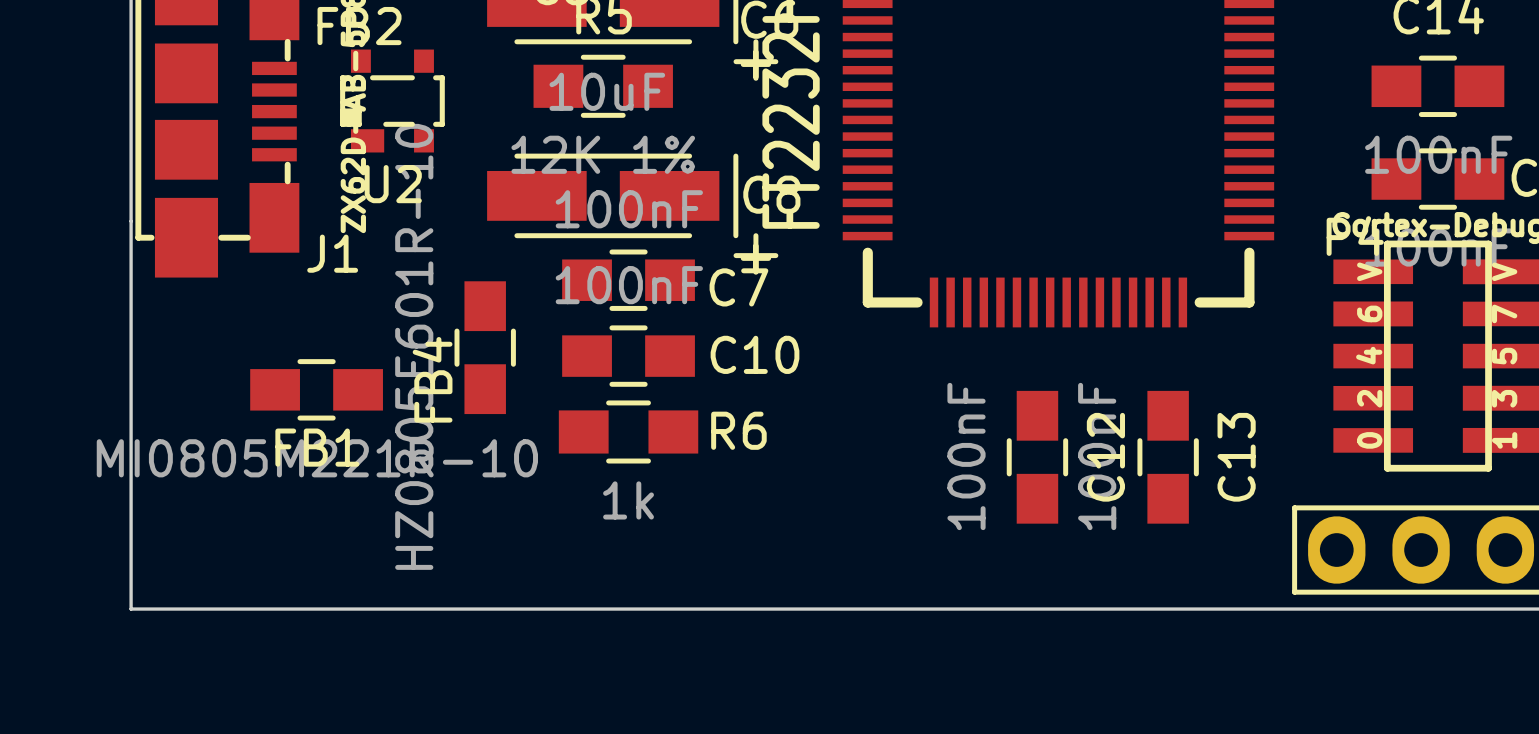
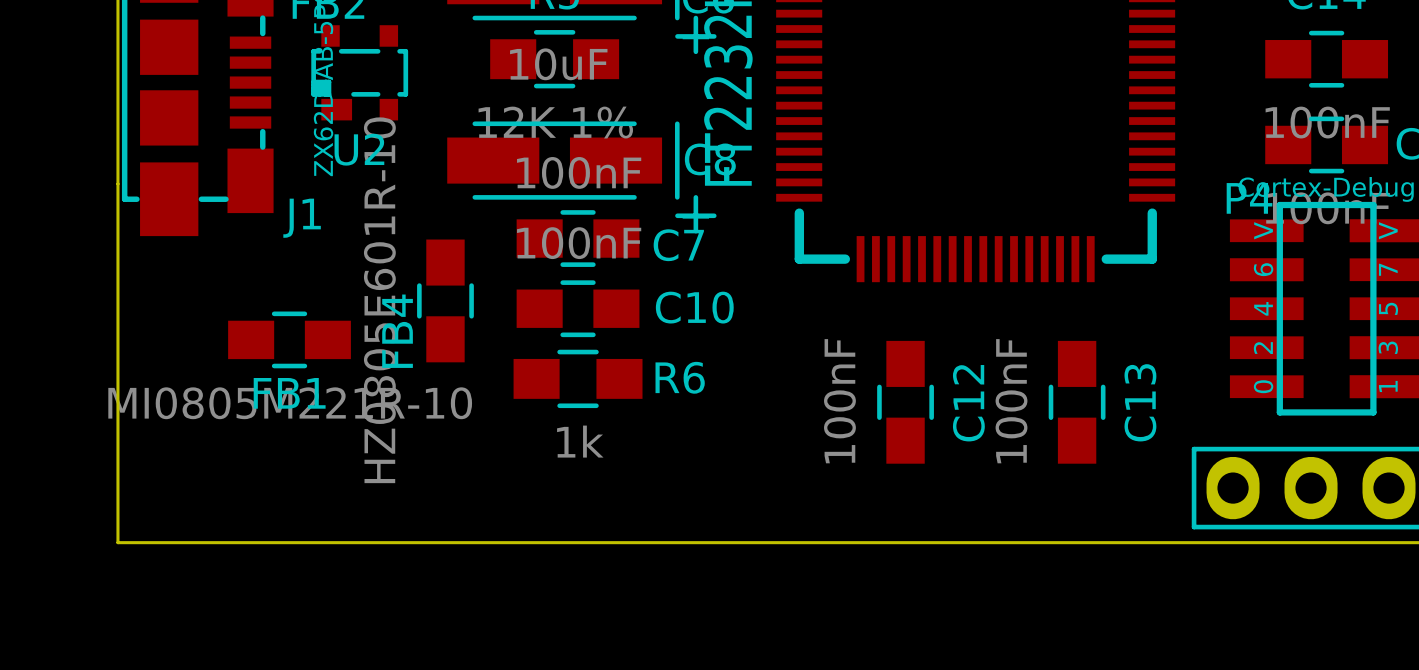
C12 position: (1037, 457) -> (905, 402)

